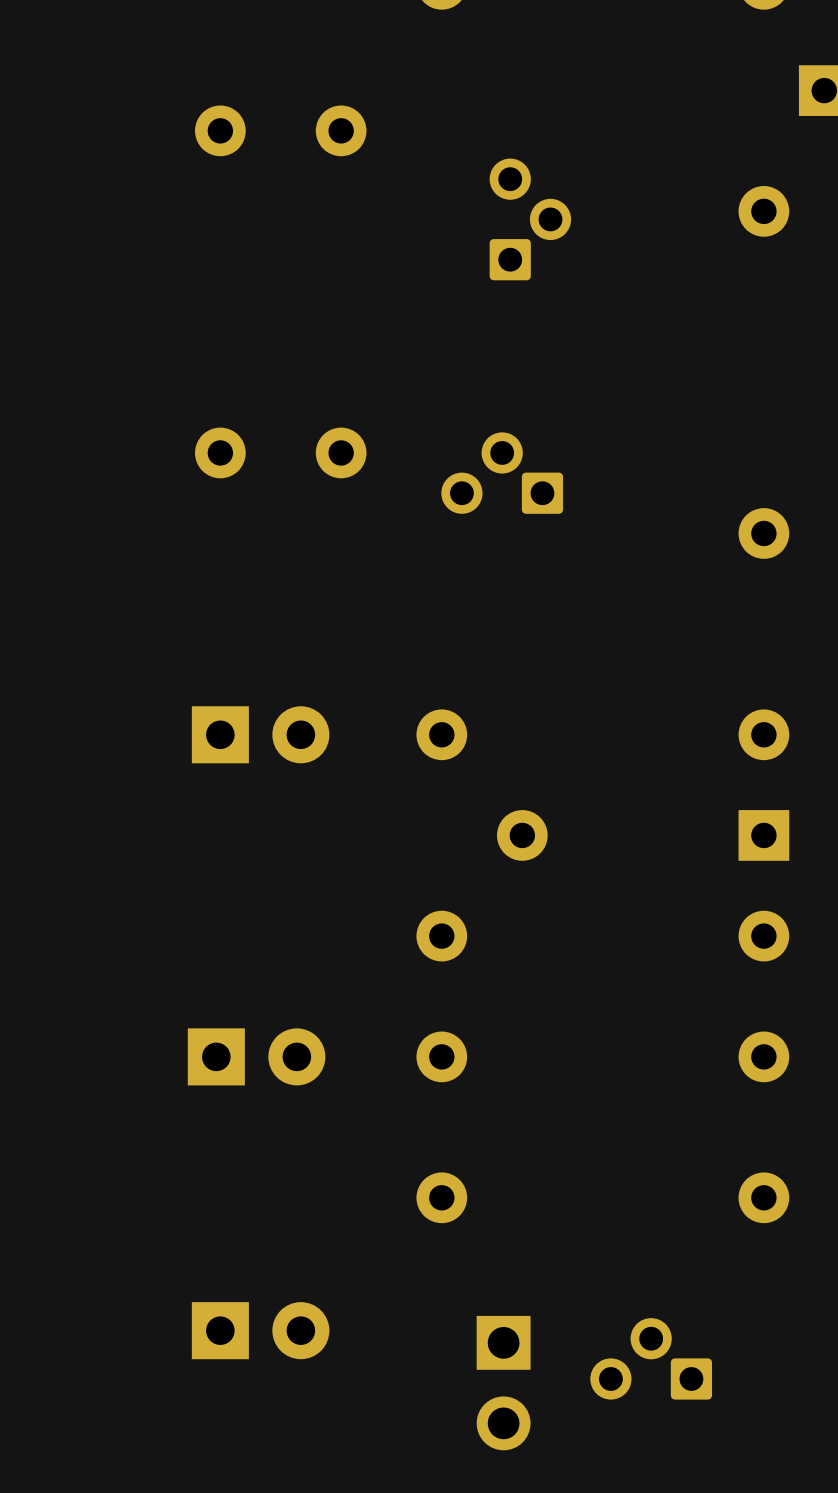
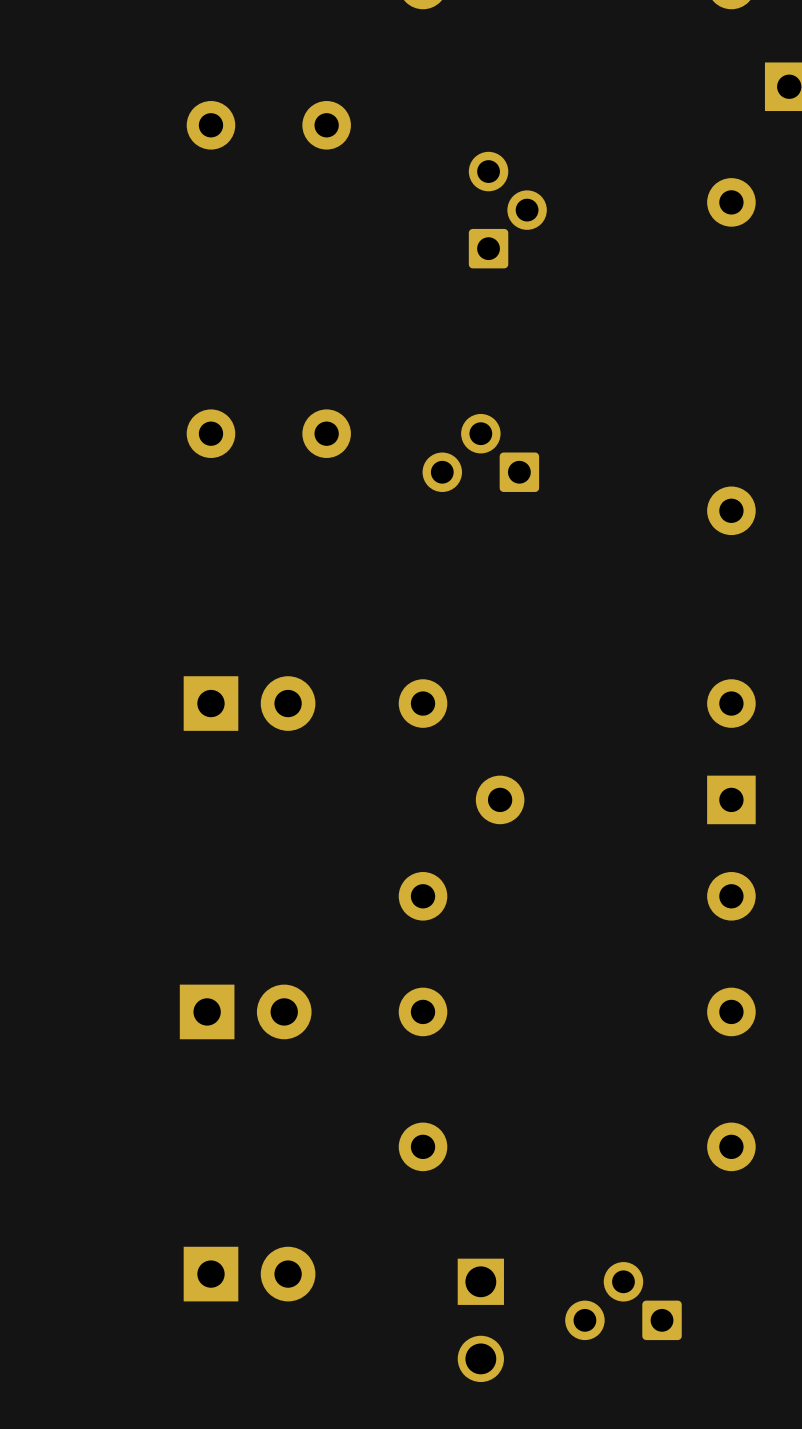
part footprint: [476, 1315, 531, 1451] -> [457, 1258, 504, 1383]

